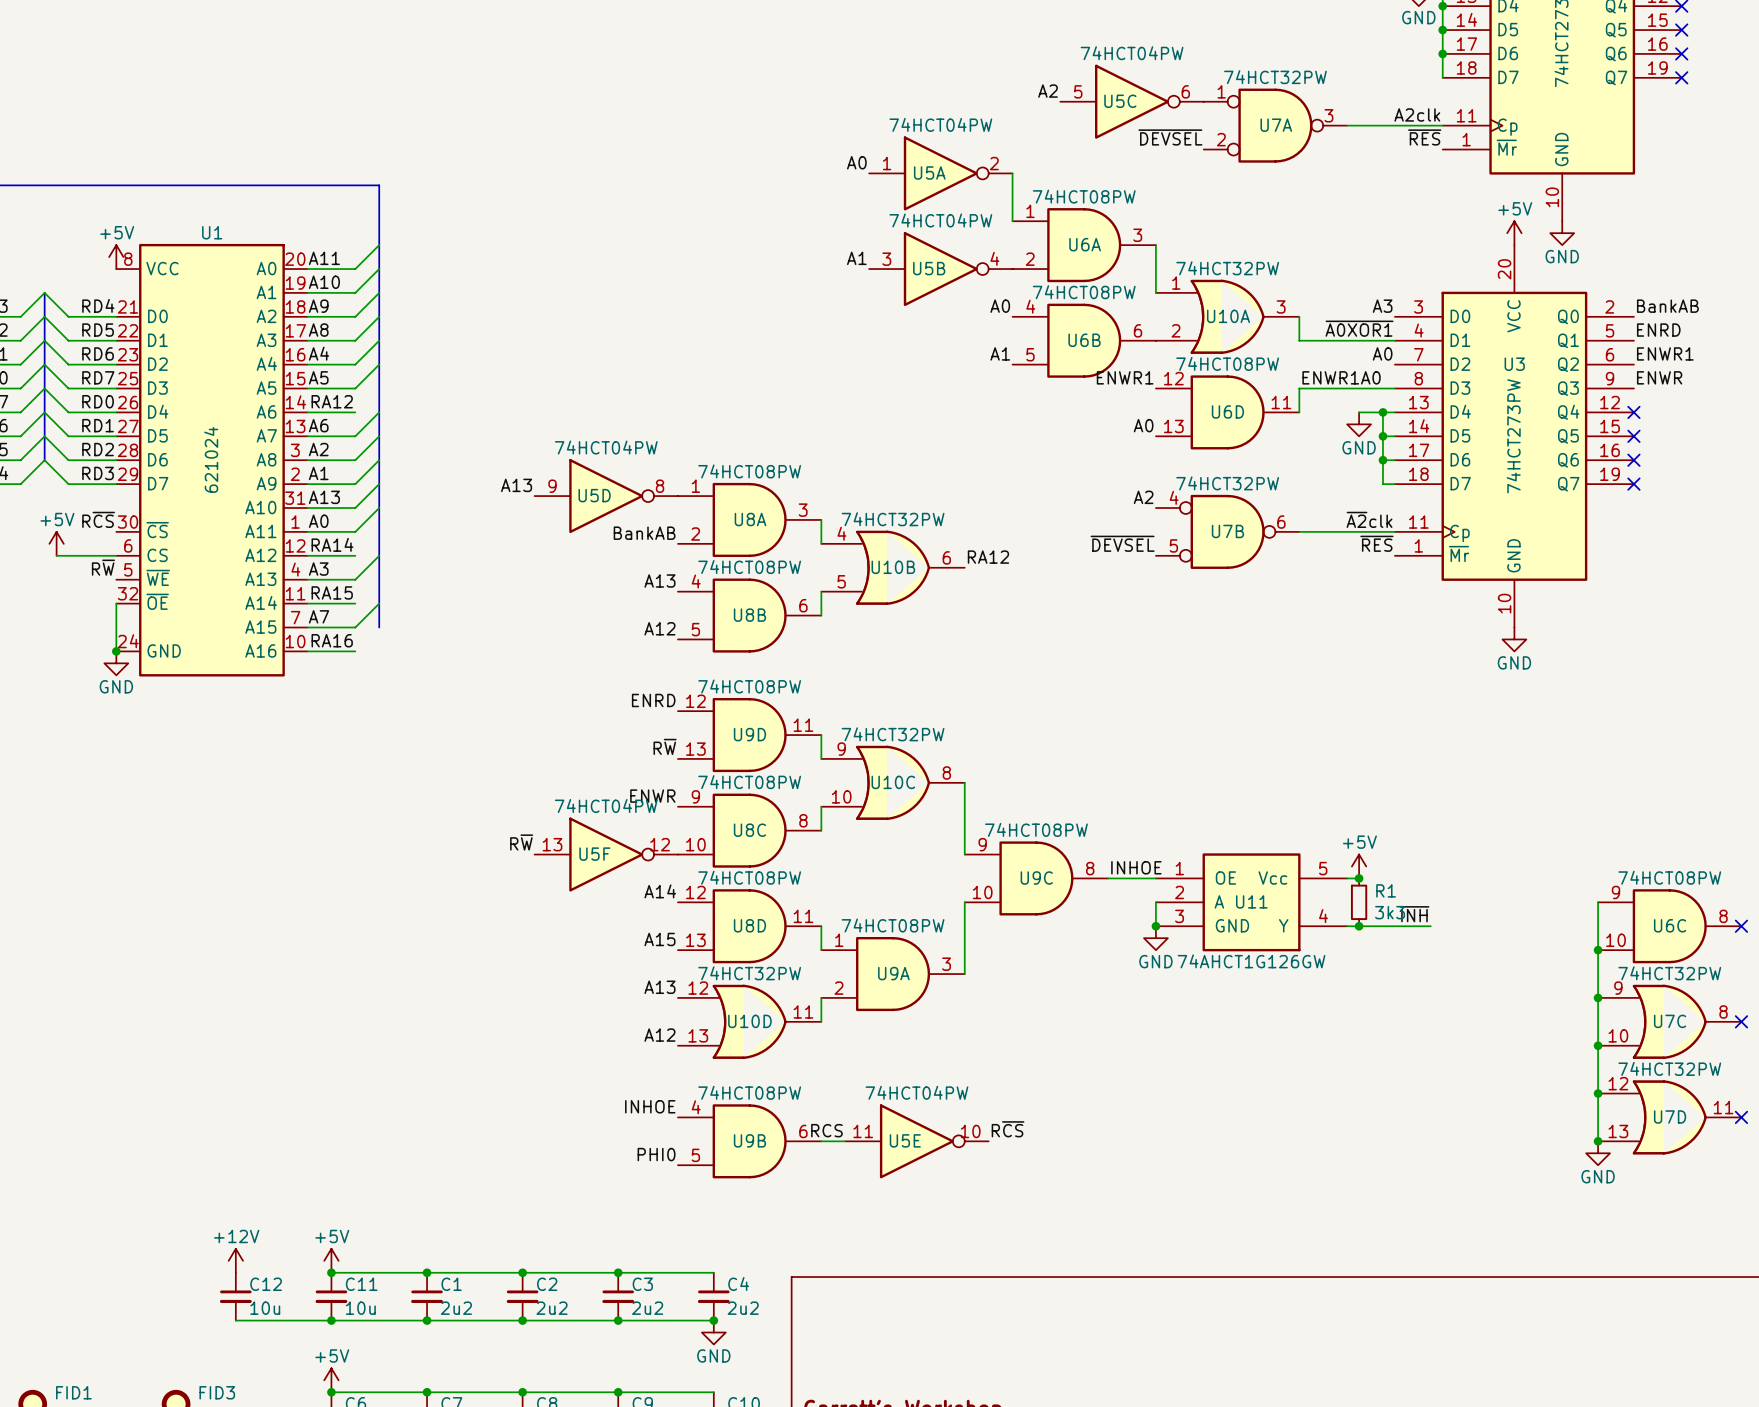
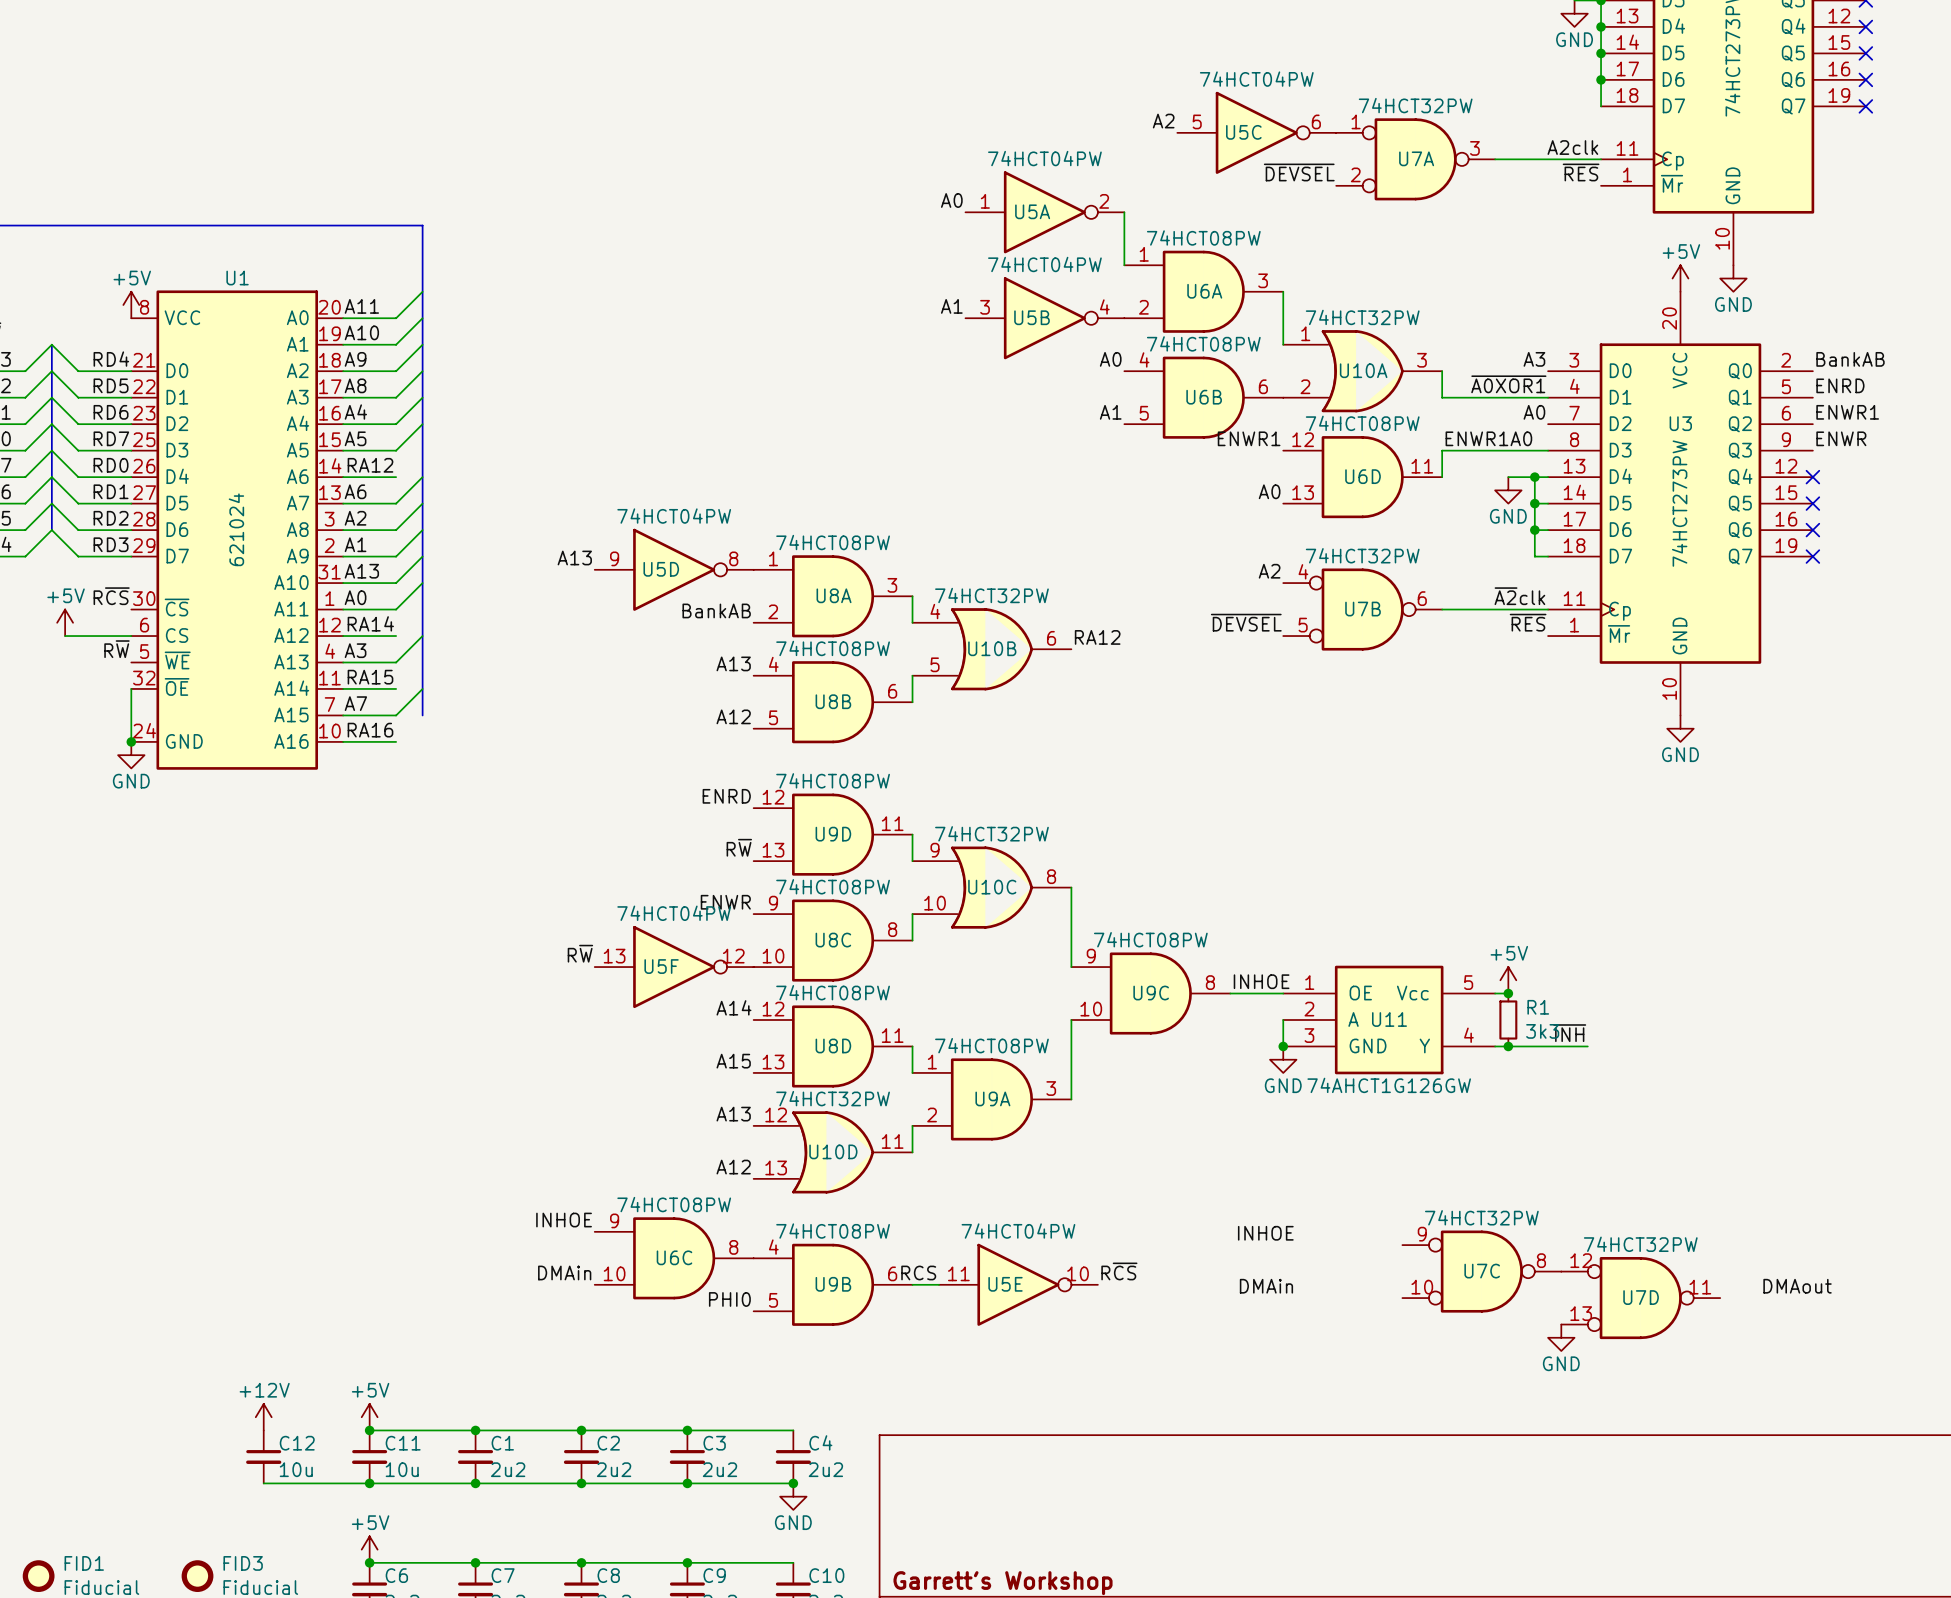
wire: (1598, 902) (1598, 1141) -> none
U6C position: (1669, 926) -> (674, 1258)
no-connect mark: (1741, 926) -> none
junction: (1598, 950) -> none
U7C symbol: [1598, 984, 1742, 1060] -> [1402, 1230, 1562, 1313]
junction: (1598, 997) -> none
no-connect mark: (1741, 1021) -> none
junction: (1598, 1045) -> none
U7D symbol: [1598, 1080, 1742, 1155] -> [1561, 1257, 1721, 1340]
junction: (1598, 1093) -> none
label: none -> INHOE (1265, 1233)
label position: INHOE (650, 1106) -> INHOE (564, 1220)
no-connect mark: (1741, 1117) -> none
label: none -> DMAin (564, 1272)
junction: (1598, 1141) -> none
label: none -> DMAin (1266, 1286)
label: none -> DMAout (1797, 1286)
power symbol position: GND (1598, 1153) -> GND (1561, 1337)

